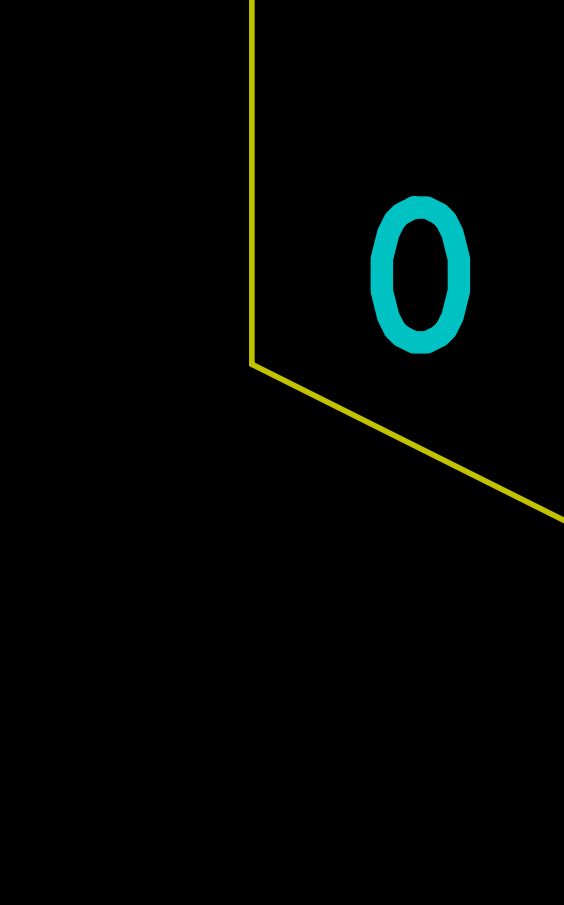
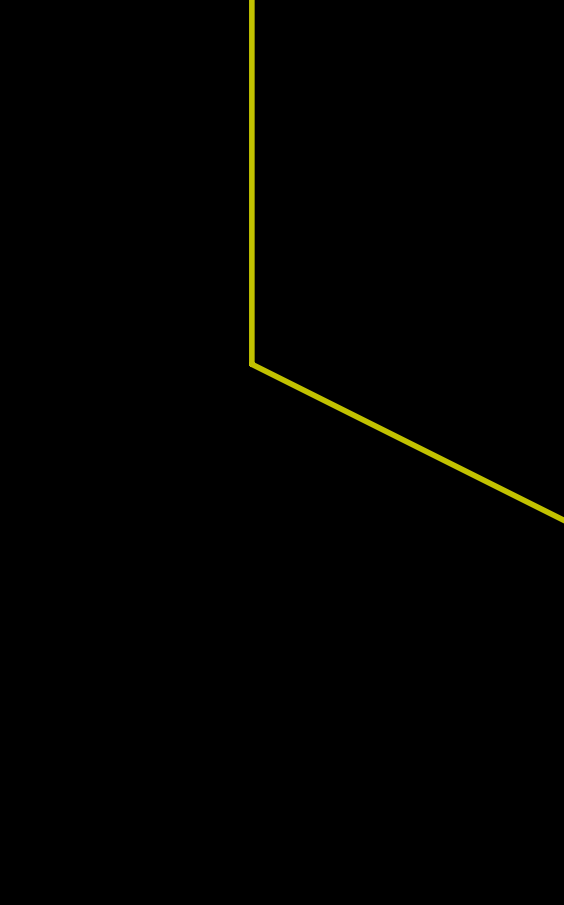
text: 0 (420, 274) -> none

